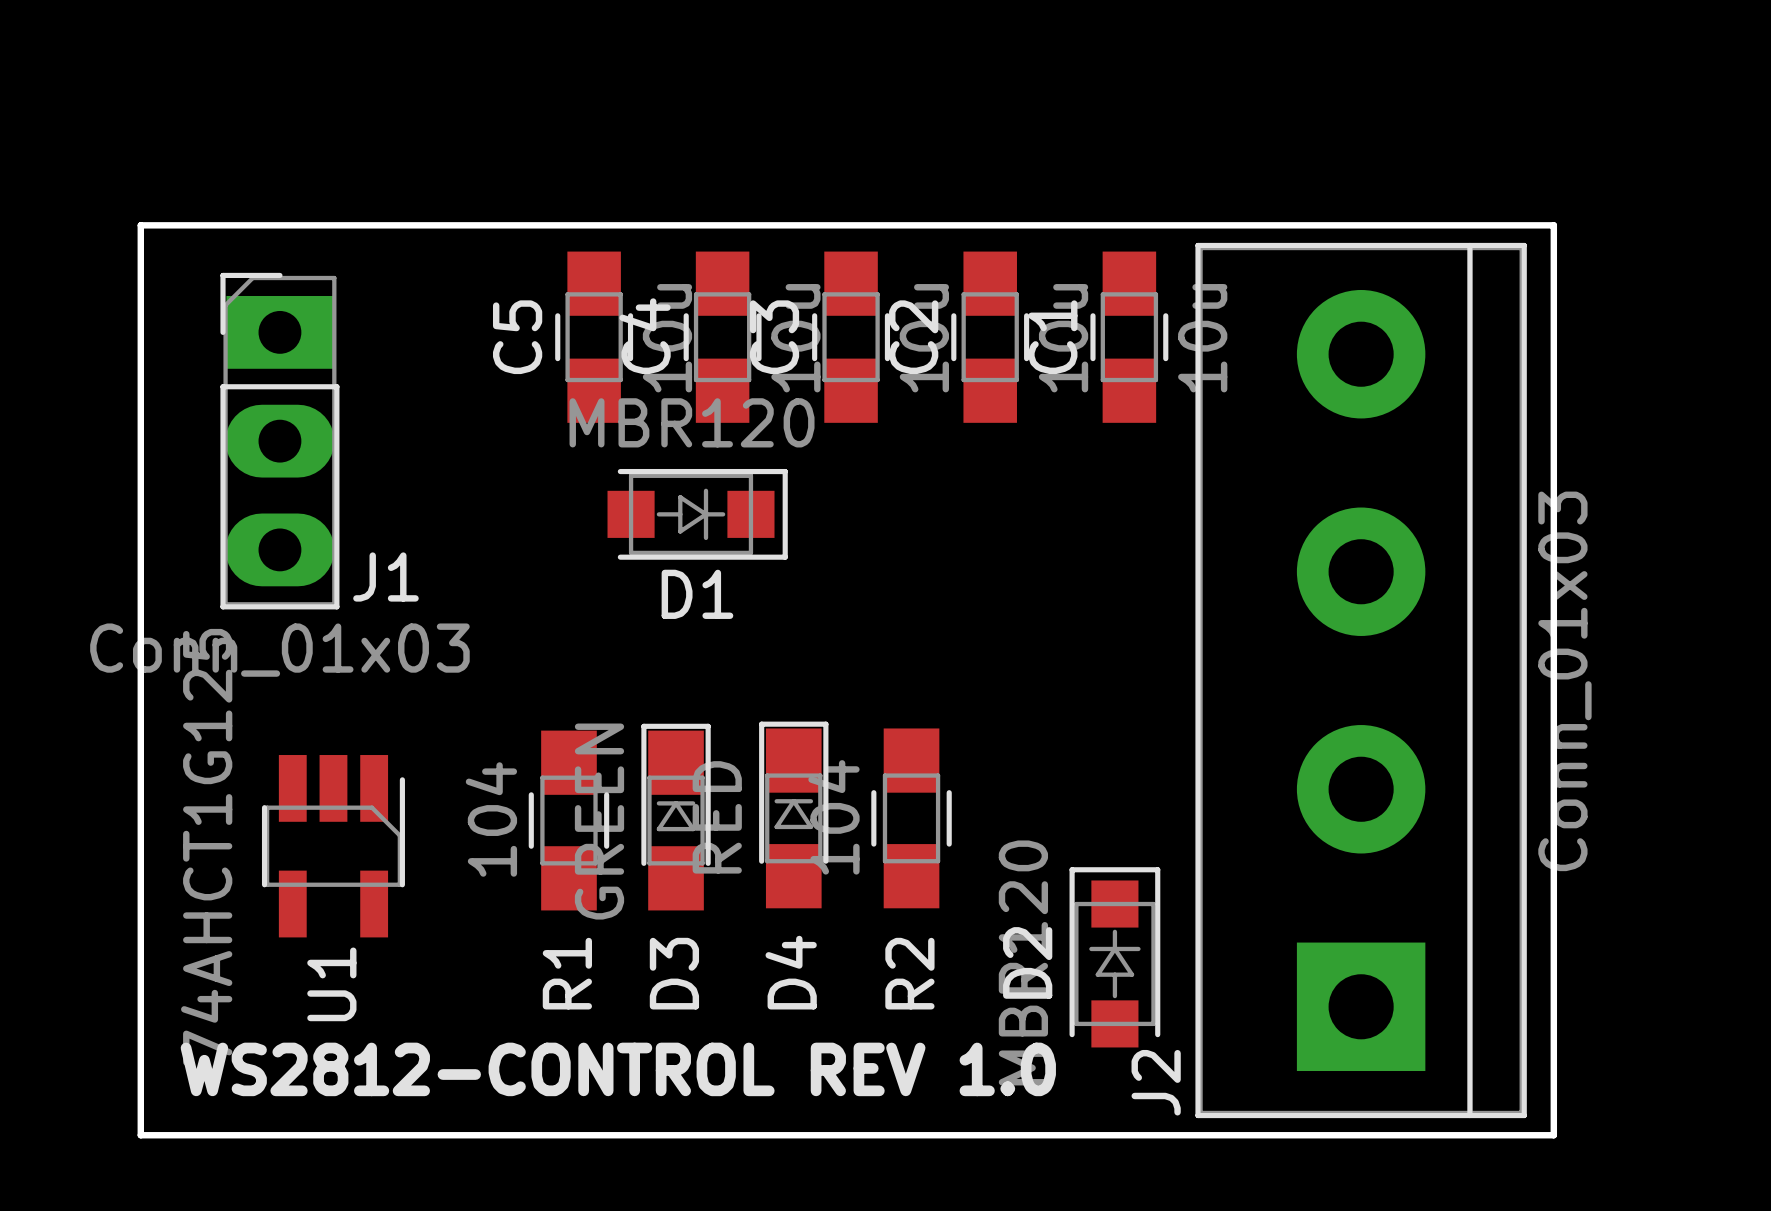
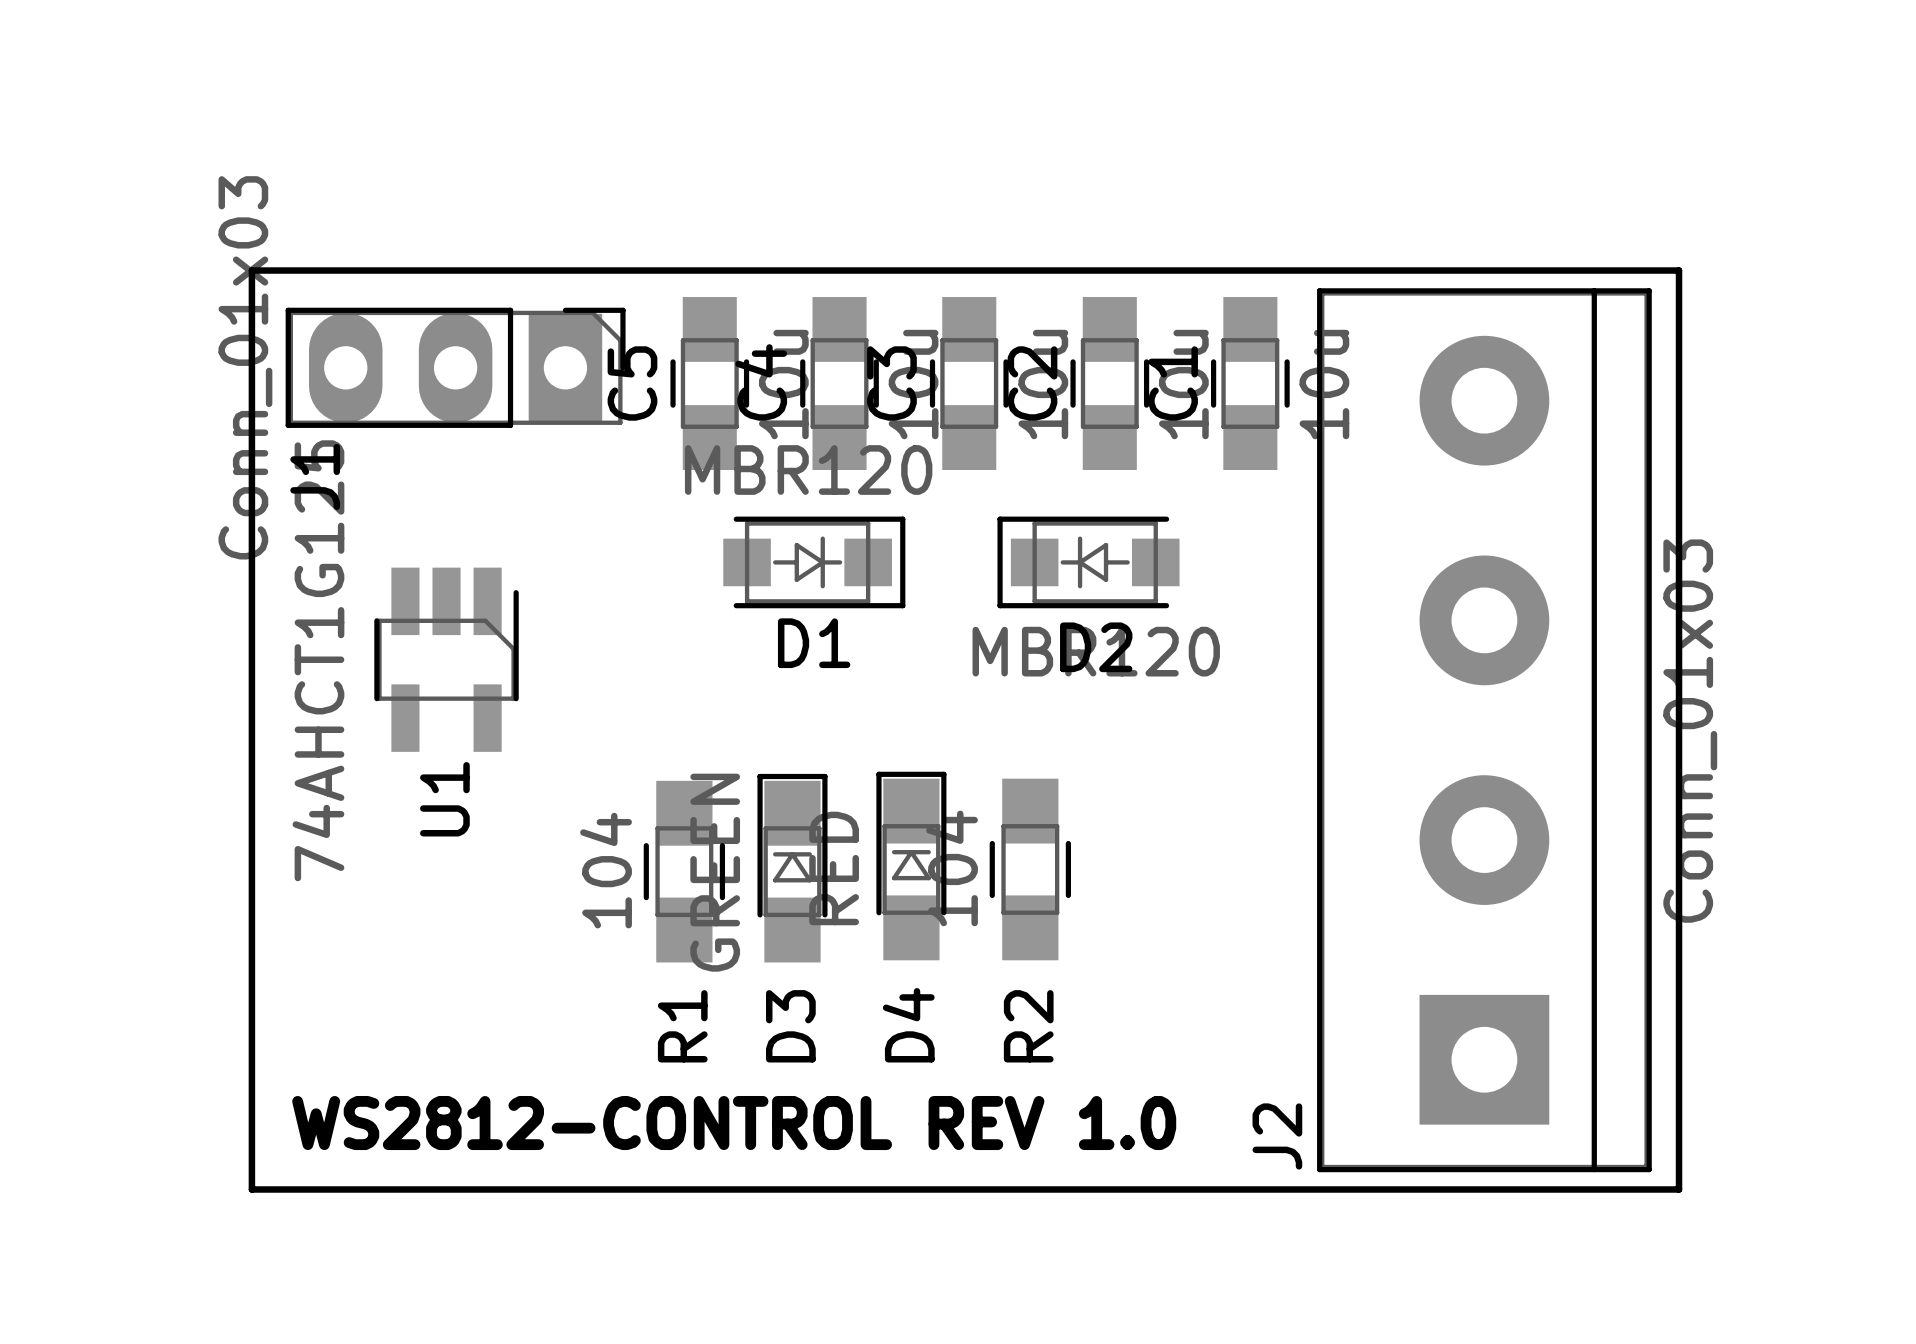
J1 rotation: 0° (279, 441) -> 90° clockwise (455, 367)
U1 position: (333, 846) -> (446, 659)
D2 rotation: 0° (1114, 957) -> 90° counterclockwise (1088, 562)
D2 position: (1114, 957) -> (1088, 562)

